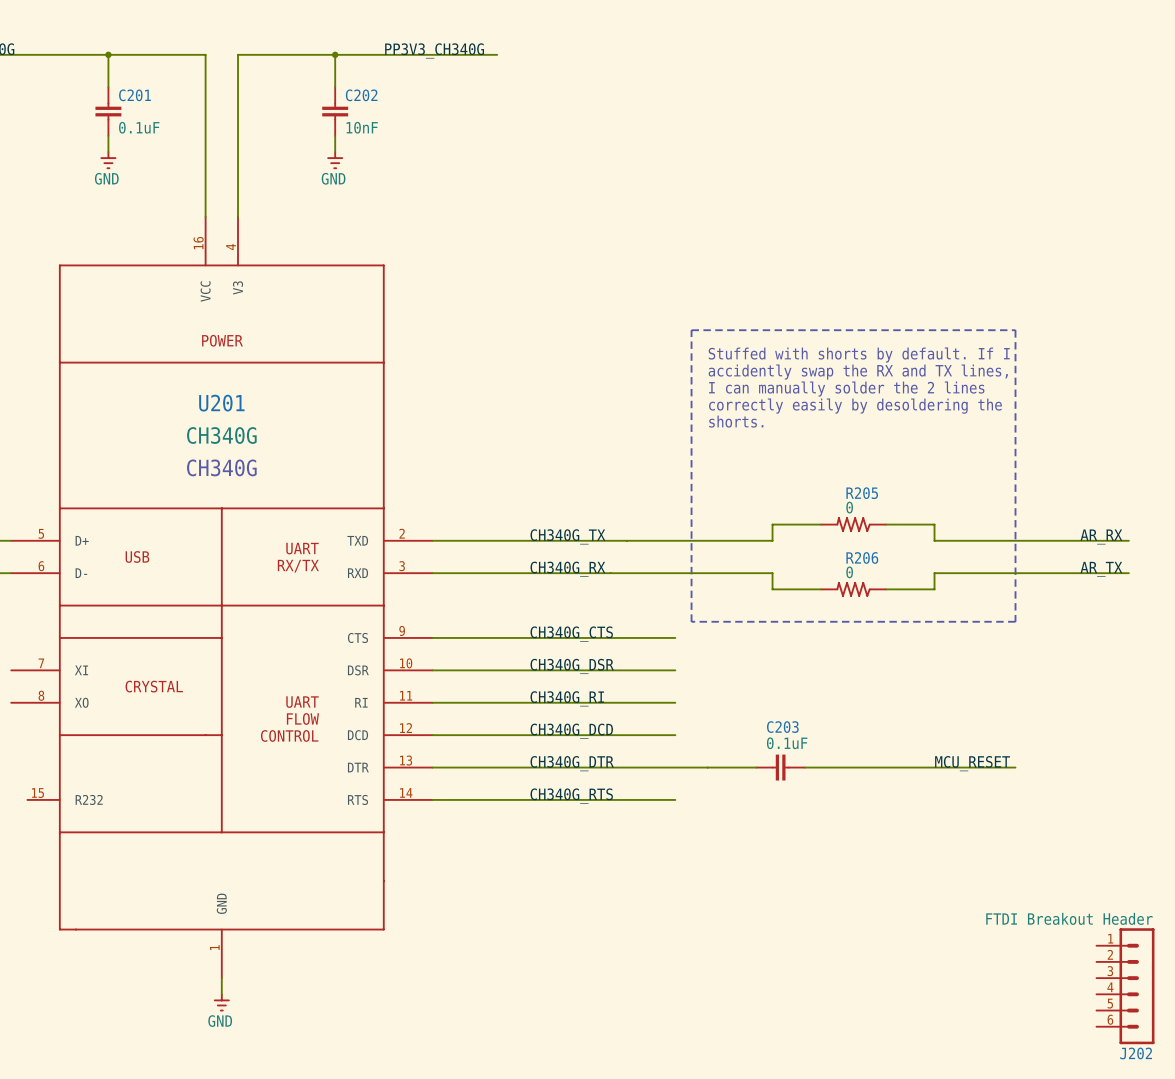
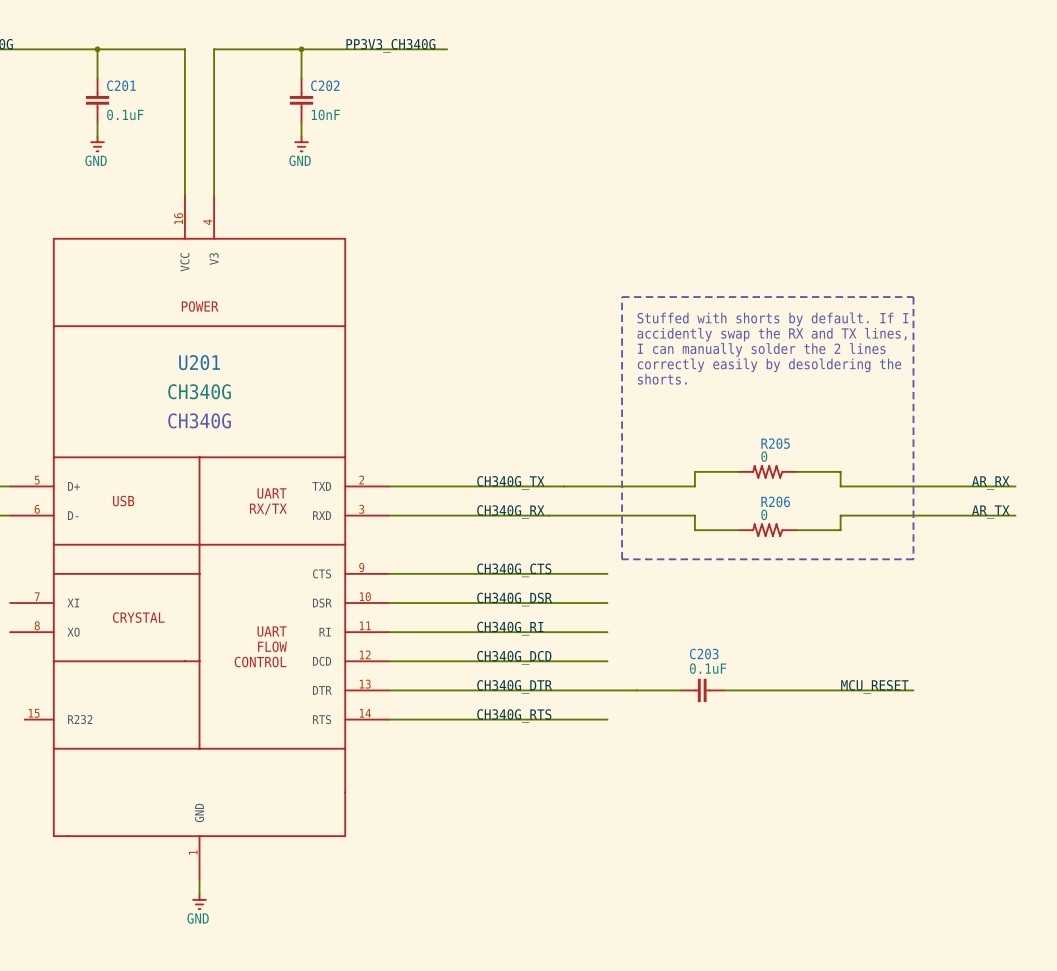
J202: FTDI Breakout Header (1125, 986) -> none

